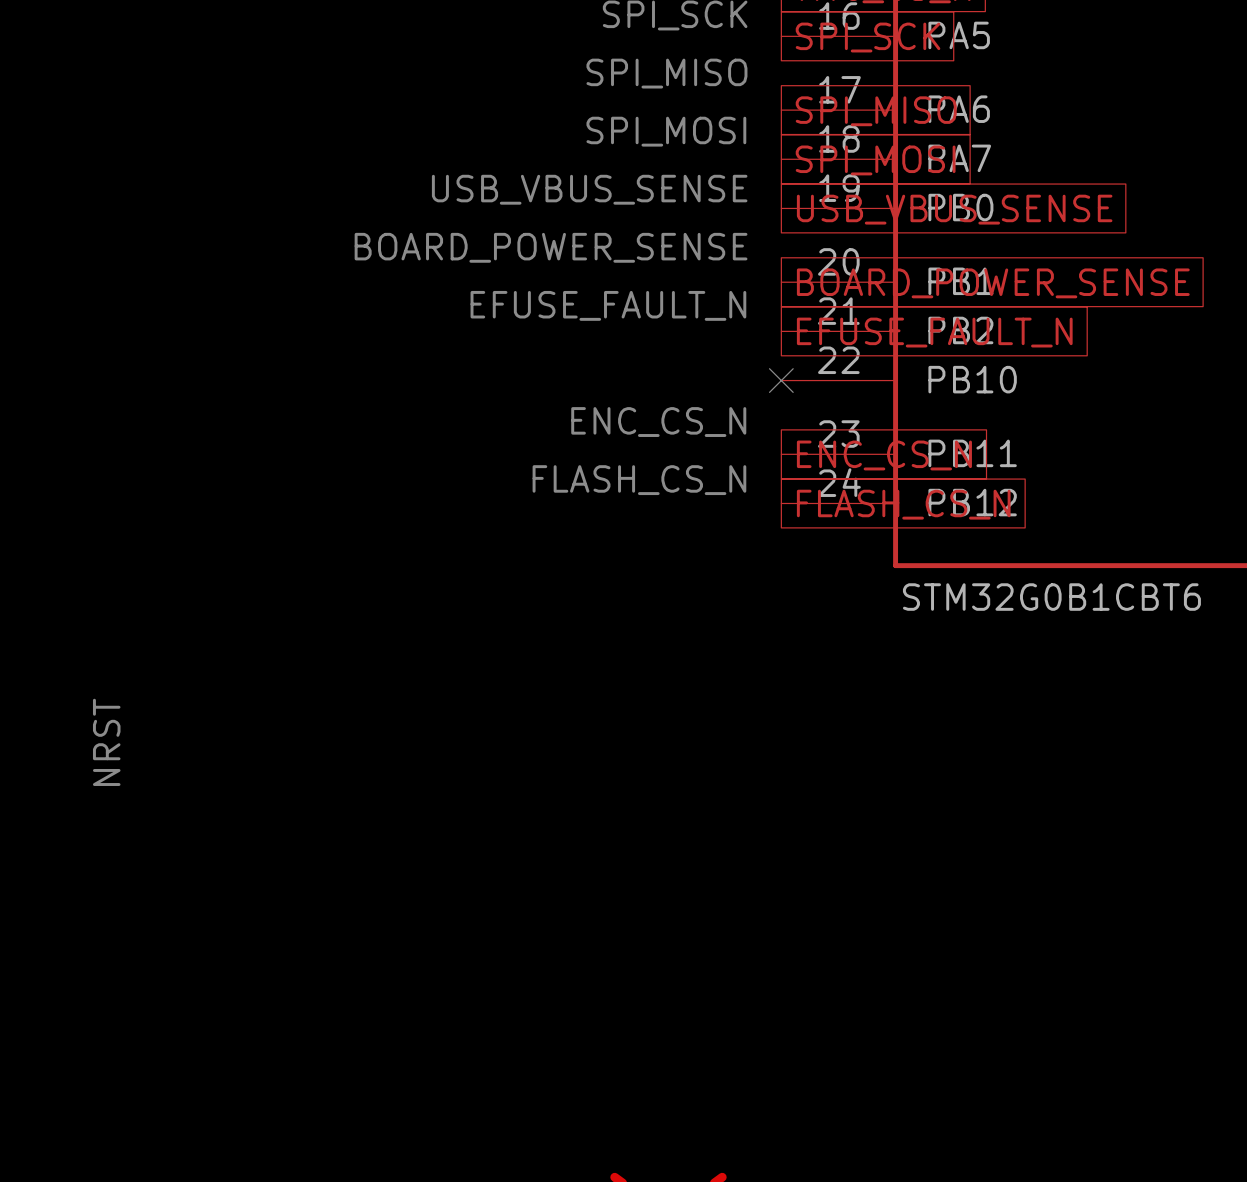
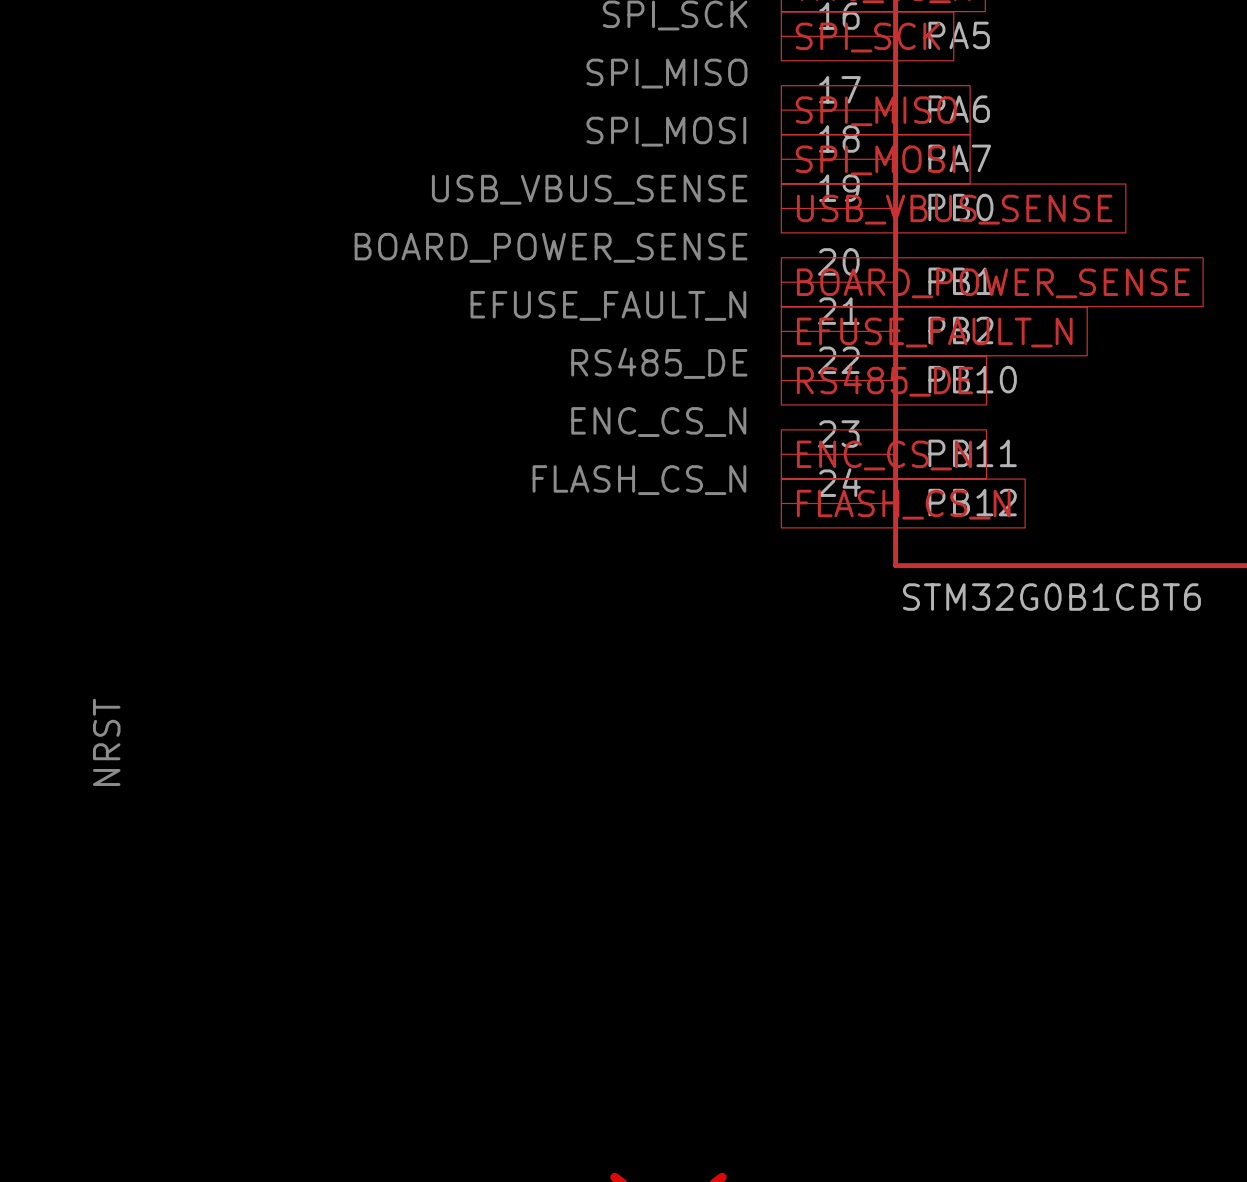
text: none -> RS485_DE (659, 363)
no-connect mark: (781, 380) -> none
global label: none -> RS485_DE (885, 381)

